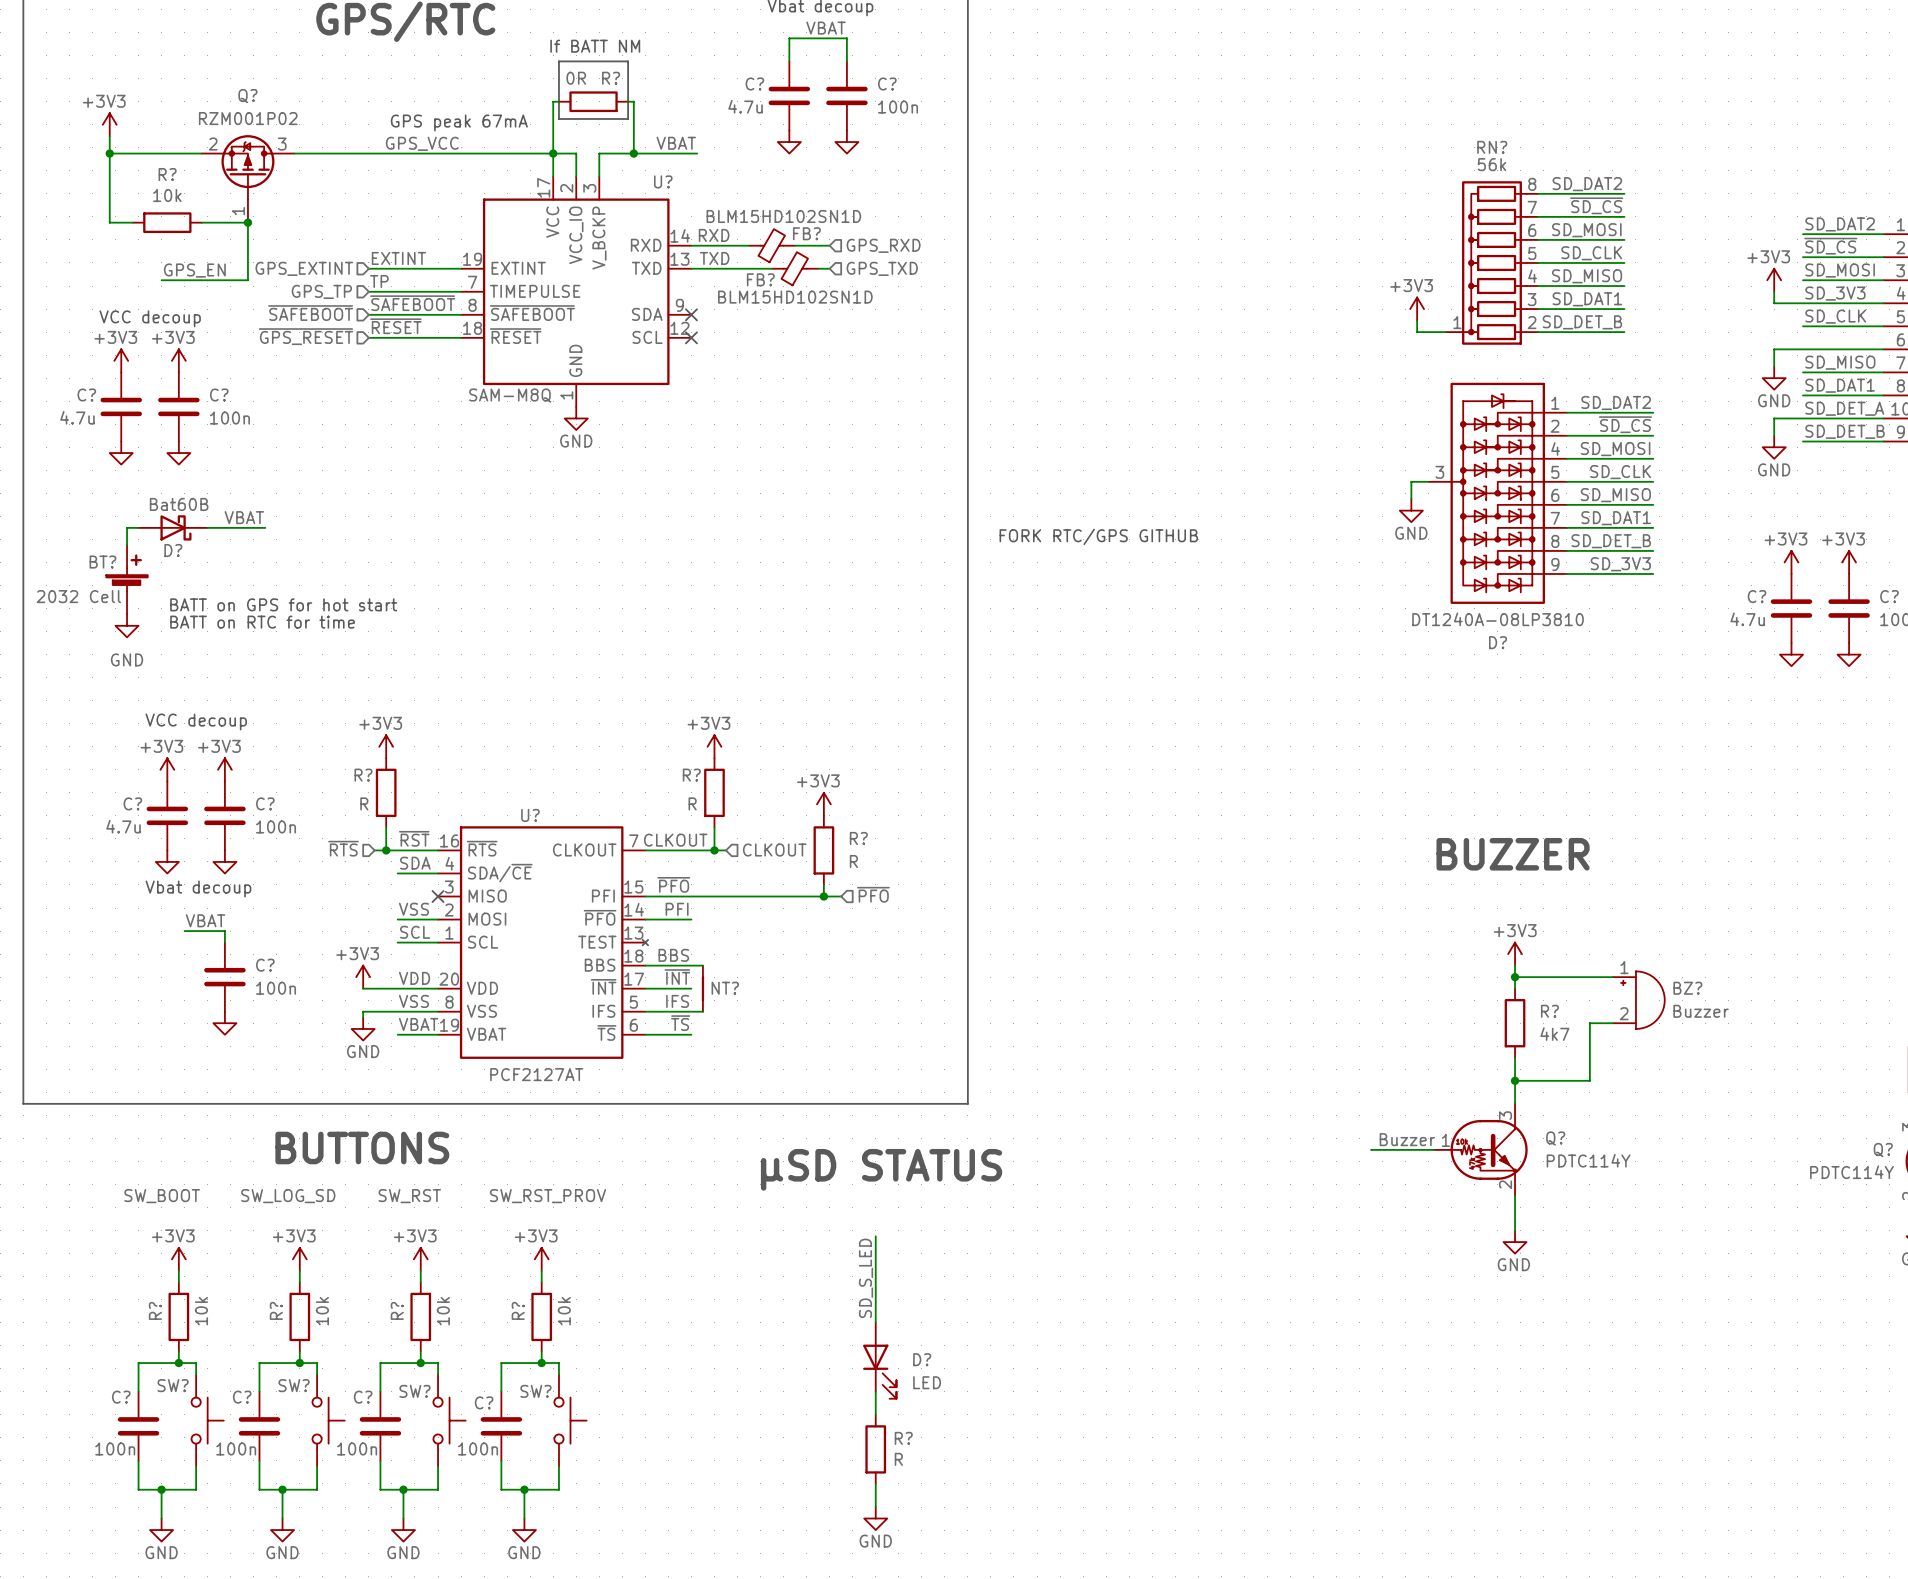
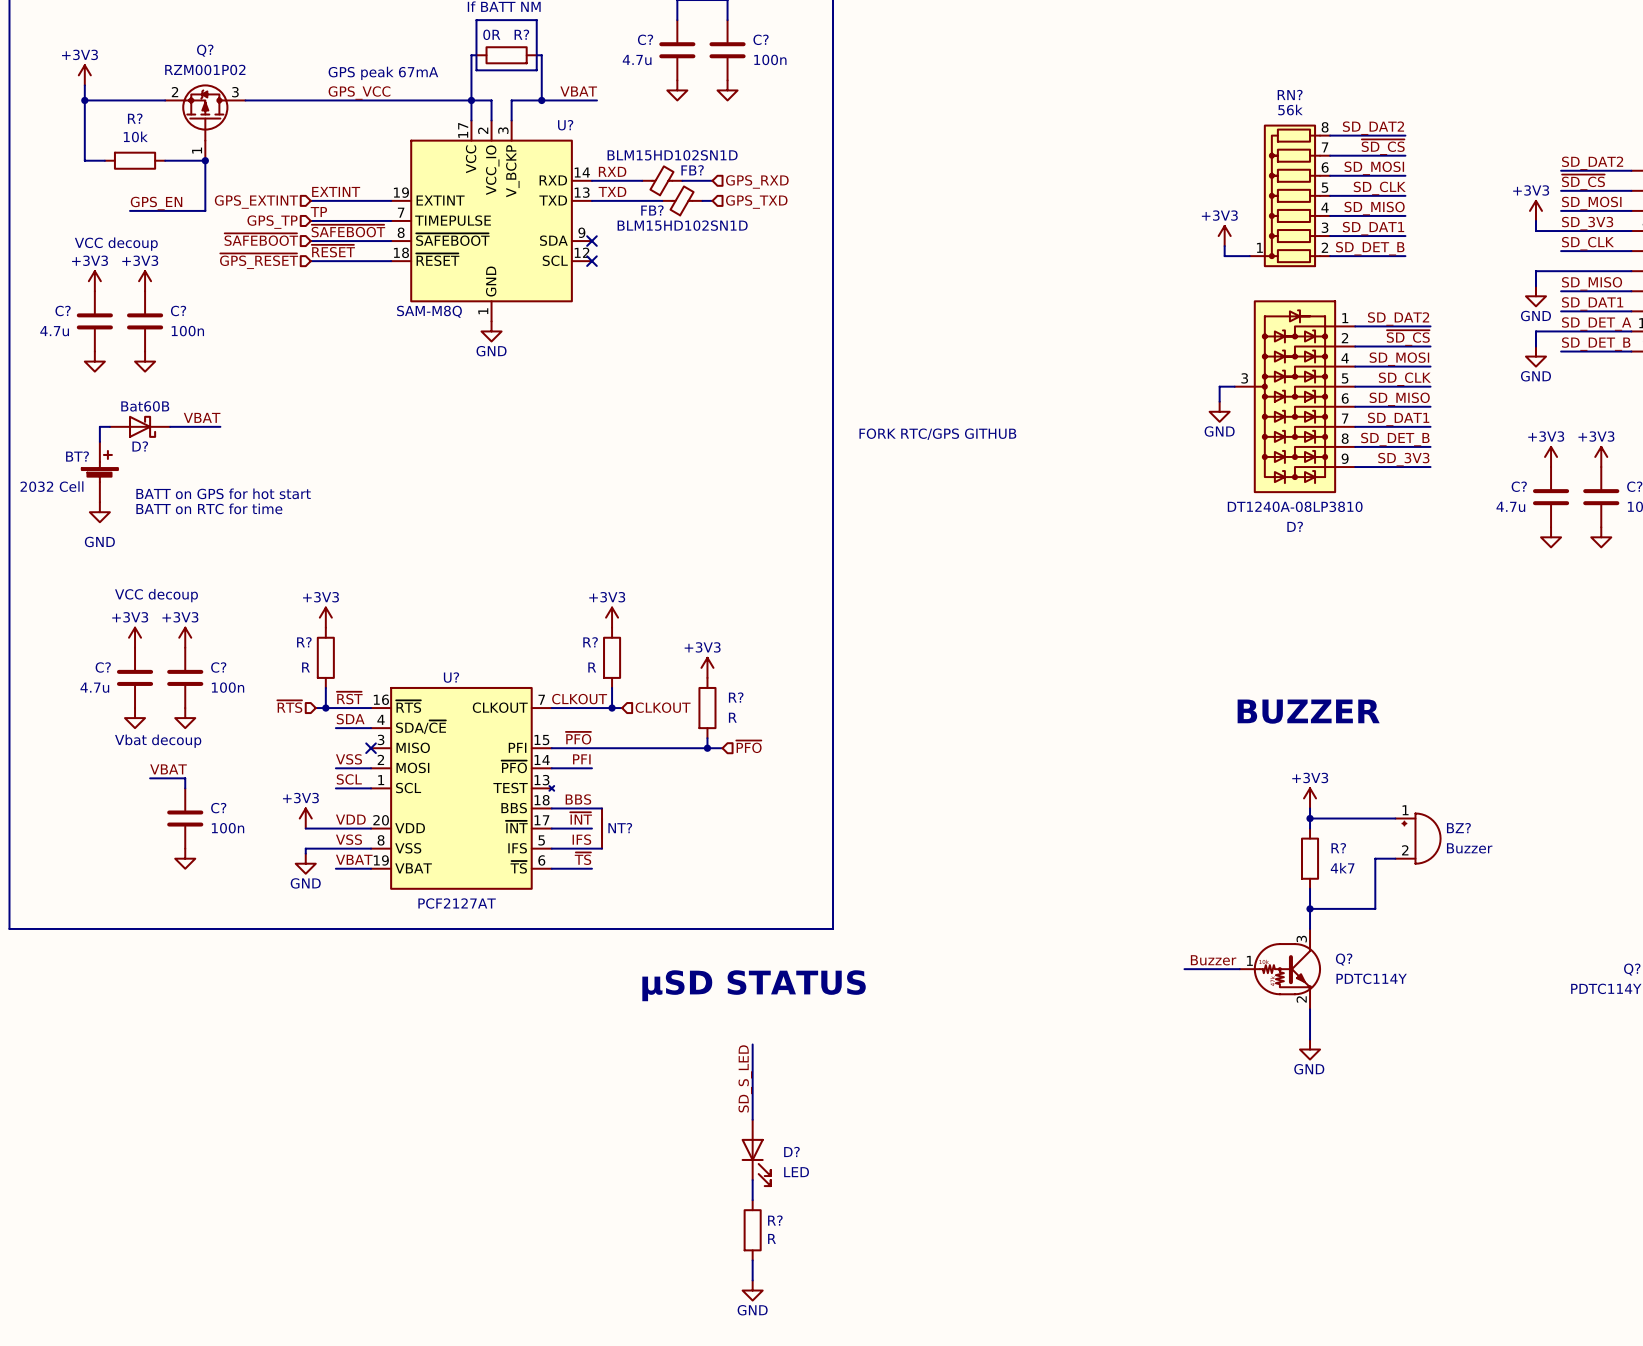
text: BUTTONS (362, 1147) -> none
power symbol: +3V3 (178, 1259) -> none
power symbol: +3V3 (299, 1259) -> none
power symbol: +3V3 (420, 1259) -> none
power symbol: +3V3 (541, 1259) -> none
wire: (178, 1270) (178, 1282) -> none
wire: (299, 1270) (299, 1282) -> none
wire: (420, 1270) (420, 1282) -> none
wire: (541, 1270) (541, 1282) -> none
R?: 10k (178, 1316) -> none
R?: 10k (299, 1316) -> none
R?: 10k (420, 1316) -> none
R?: 10k (541, 1316) -> none
wire: (178, 1351) (178, 1363) -> none
wire: (299, 1351) (299, 1363) -> none
wire: (420, 1351) (420, 1363) -> none
wire: (541, 1351) (541, 1363) -> none
junction: (178, 1363) -> none
junction: (299, 1363) -> none
junction: (420, 1363) -> none
junction: (541, 1363) -> none
wire: (196, 1374) (196, 1363) (138, 1363) (138, 1391) -> none
wire: (317, 1374) (317, 1363) (259, 1363) (259, 1391) -> none
wire: (438, 1374) (438, 1363) (380, 1363) (380, 1391) -> none
wire: (558, 1374) (558, 1363) (501, 1363) (501, 1391) -> none
SW?: SW_BOOT (207, 1420) -> none
SW?: SW_LOG_SD (328, 1420) -> none
SW?: SW_RST (449, 1420) -> none
SW?: SW_RST_PROV (570, 1420) -> none
C?: 100n (138, 1426) -> none
C?: 100n (259, 1426) -> none
C?: 100n (380, 1426) -> none
C?: 100n (501, 1426) -> none
wire: (138, 1460) (138, 1489) (196, 1489) (196, 1466) -> none
wire: (259, 1460) (259, 1489) (317, 1489) (317, 1466) -> none
wire: (380, 1460) (380, 1489) (438, 1489) (438, 1466) -> none
wire: (501, 1460) (501, 1489) (558, 1489) (558, 1466) -> none
wire: (161, 1489) (161, 1518) -> none
junction: (161, 1489) -> none
wire: (282, 1489) (282, 1518) -> none
junction: (282, 1489) -> none
wire: (403, 1489) (403, 1518) -> none
junction: (403, 1489) -> none
wire: (524, 1489) (524, 1518) -> none
junction: (524, 1489) -> none
power symbol: GND (161, 1530) -> none
power symbol: GND (282, 1530) -> none
power symbol: GND (403, 1530) -> none
power symbol: GND (524, 1530) -> none

